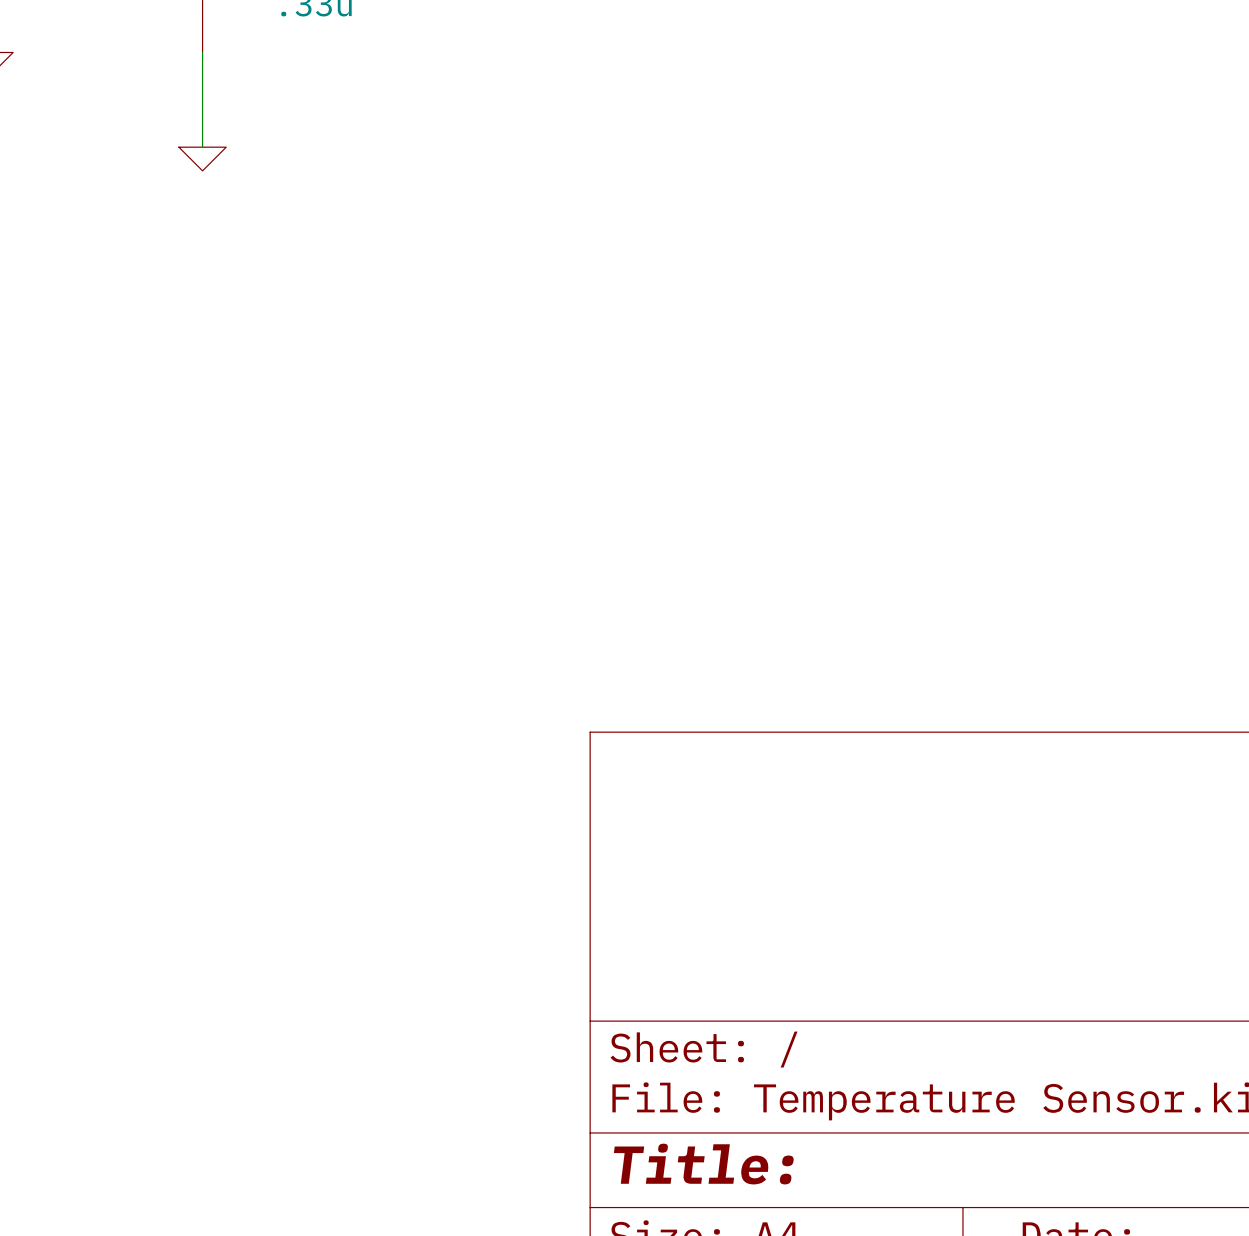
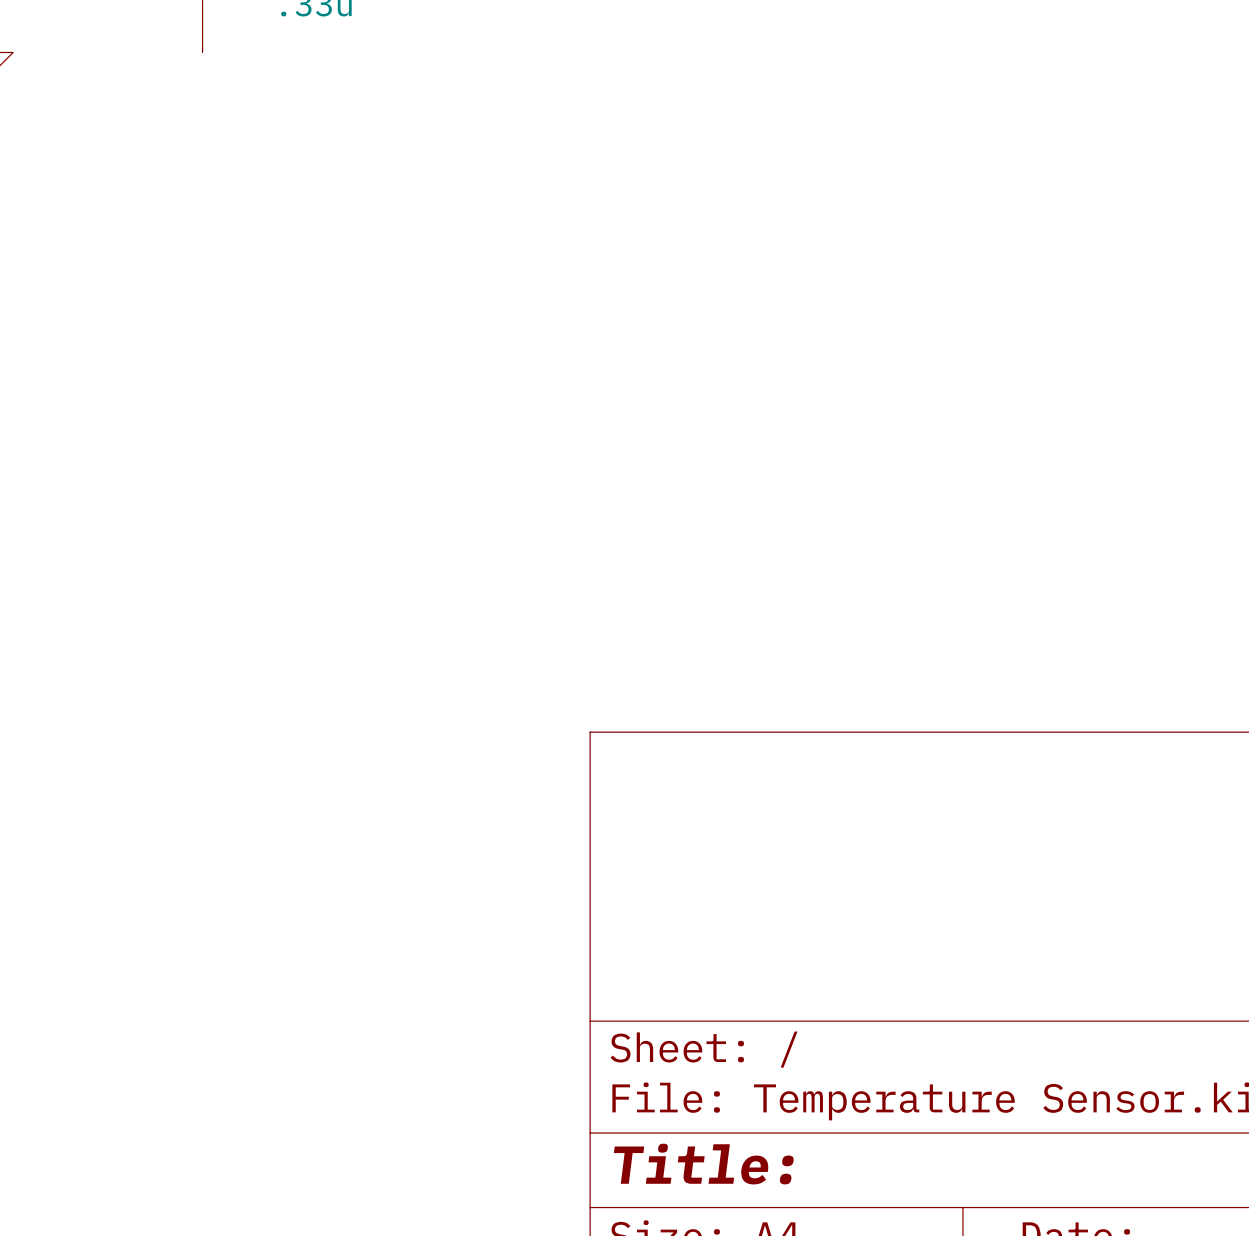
wire: (202, 52) (202, 147) -> none
power symbol: (202, 159) -> none

